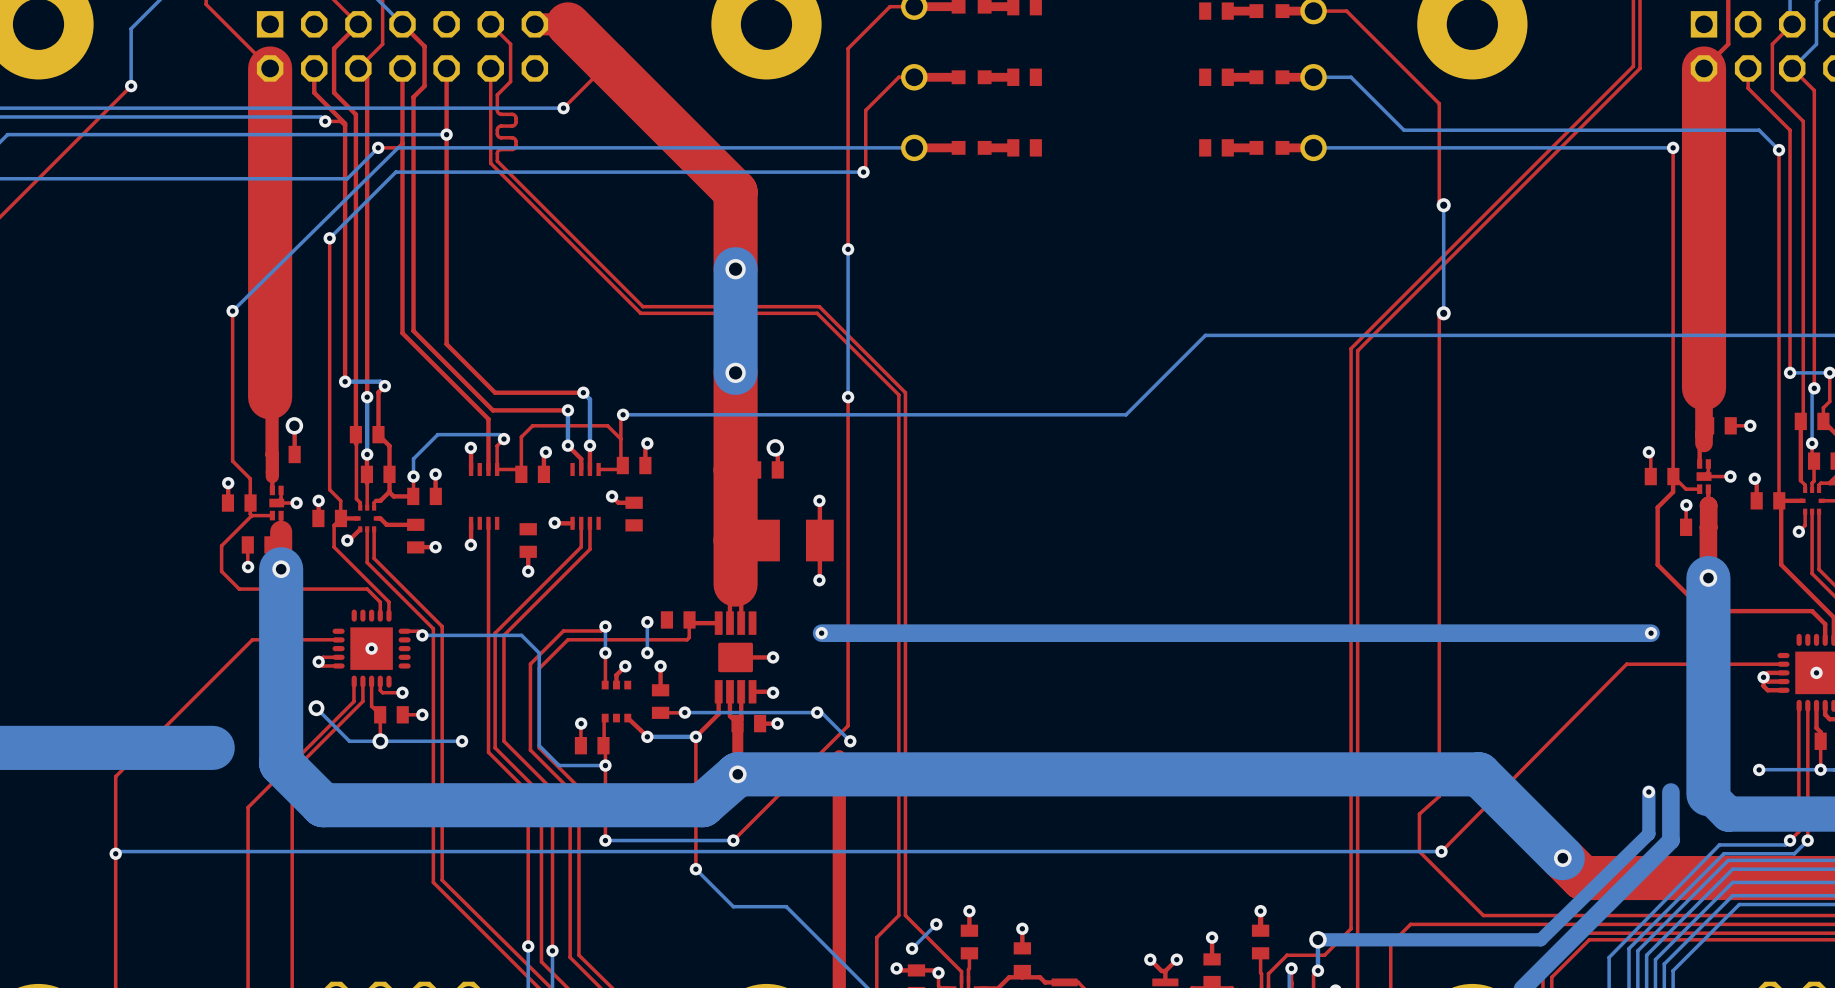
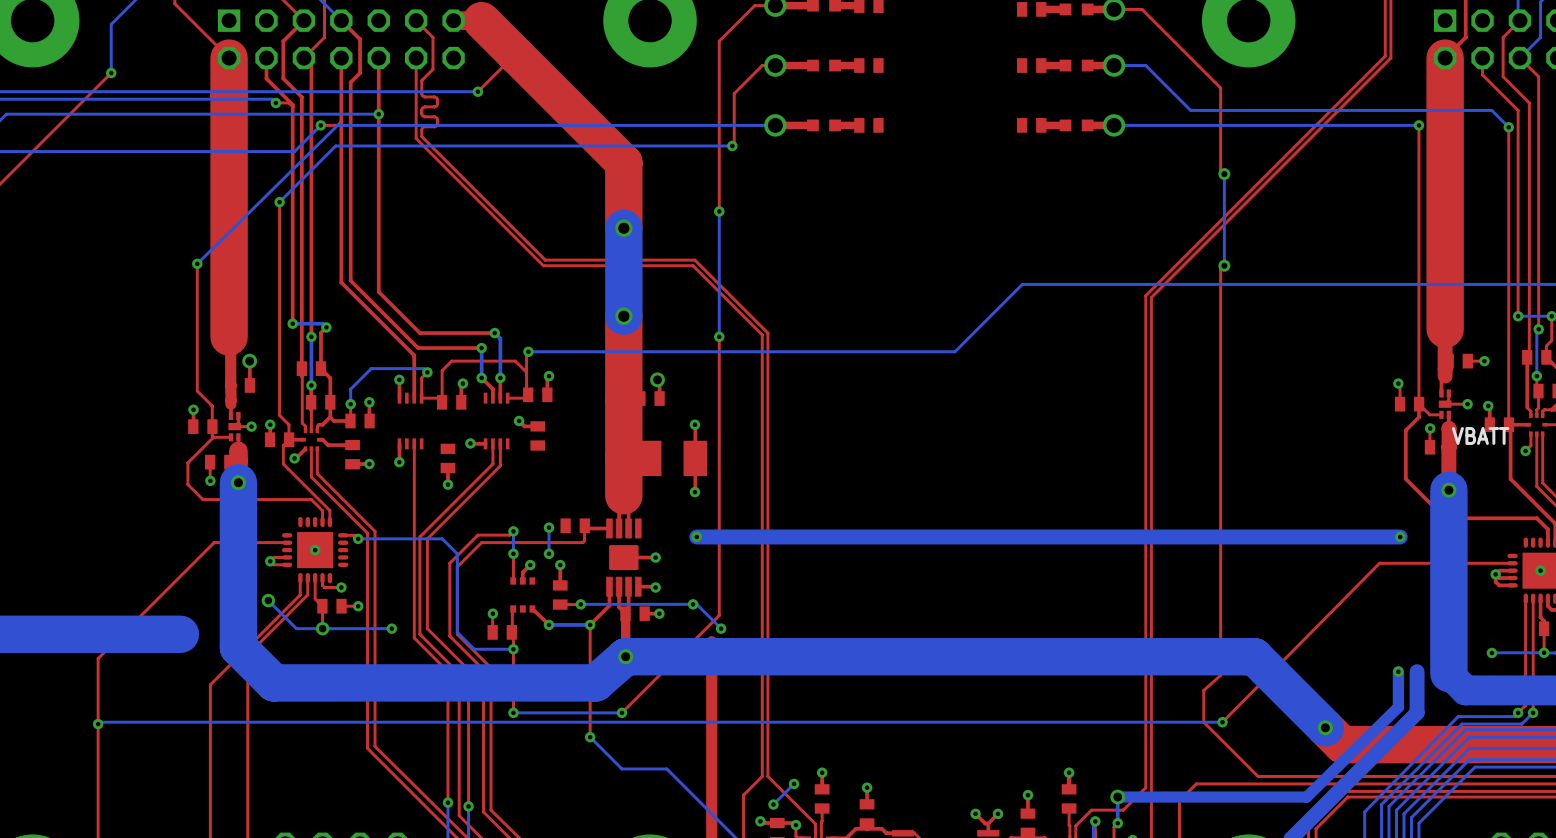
text: none -> VBATT (1480, 435)

